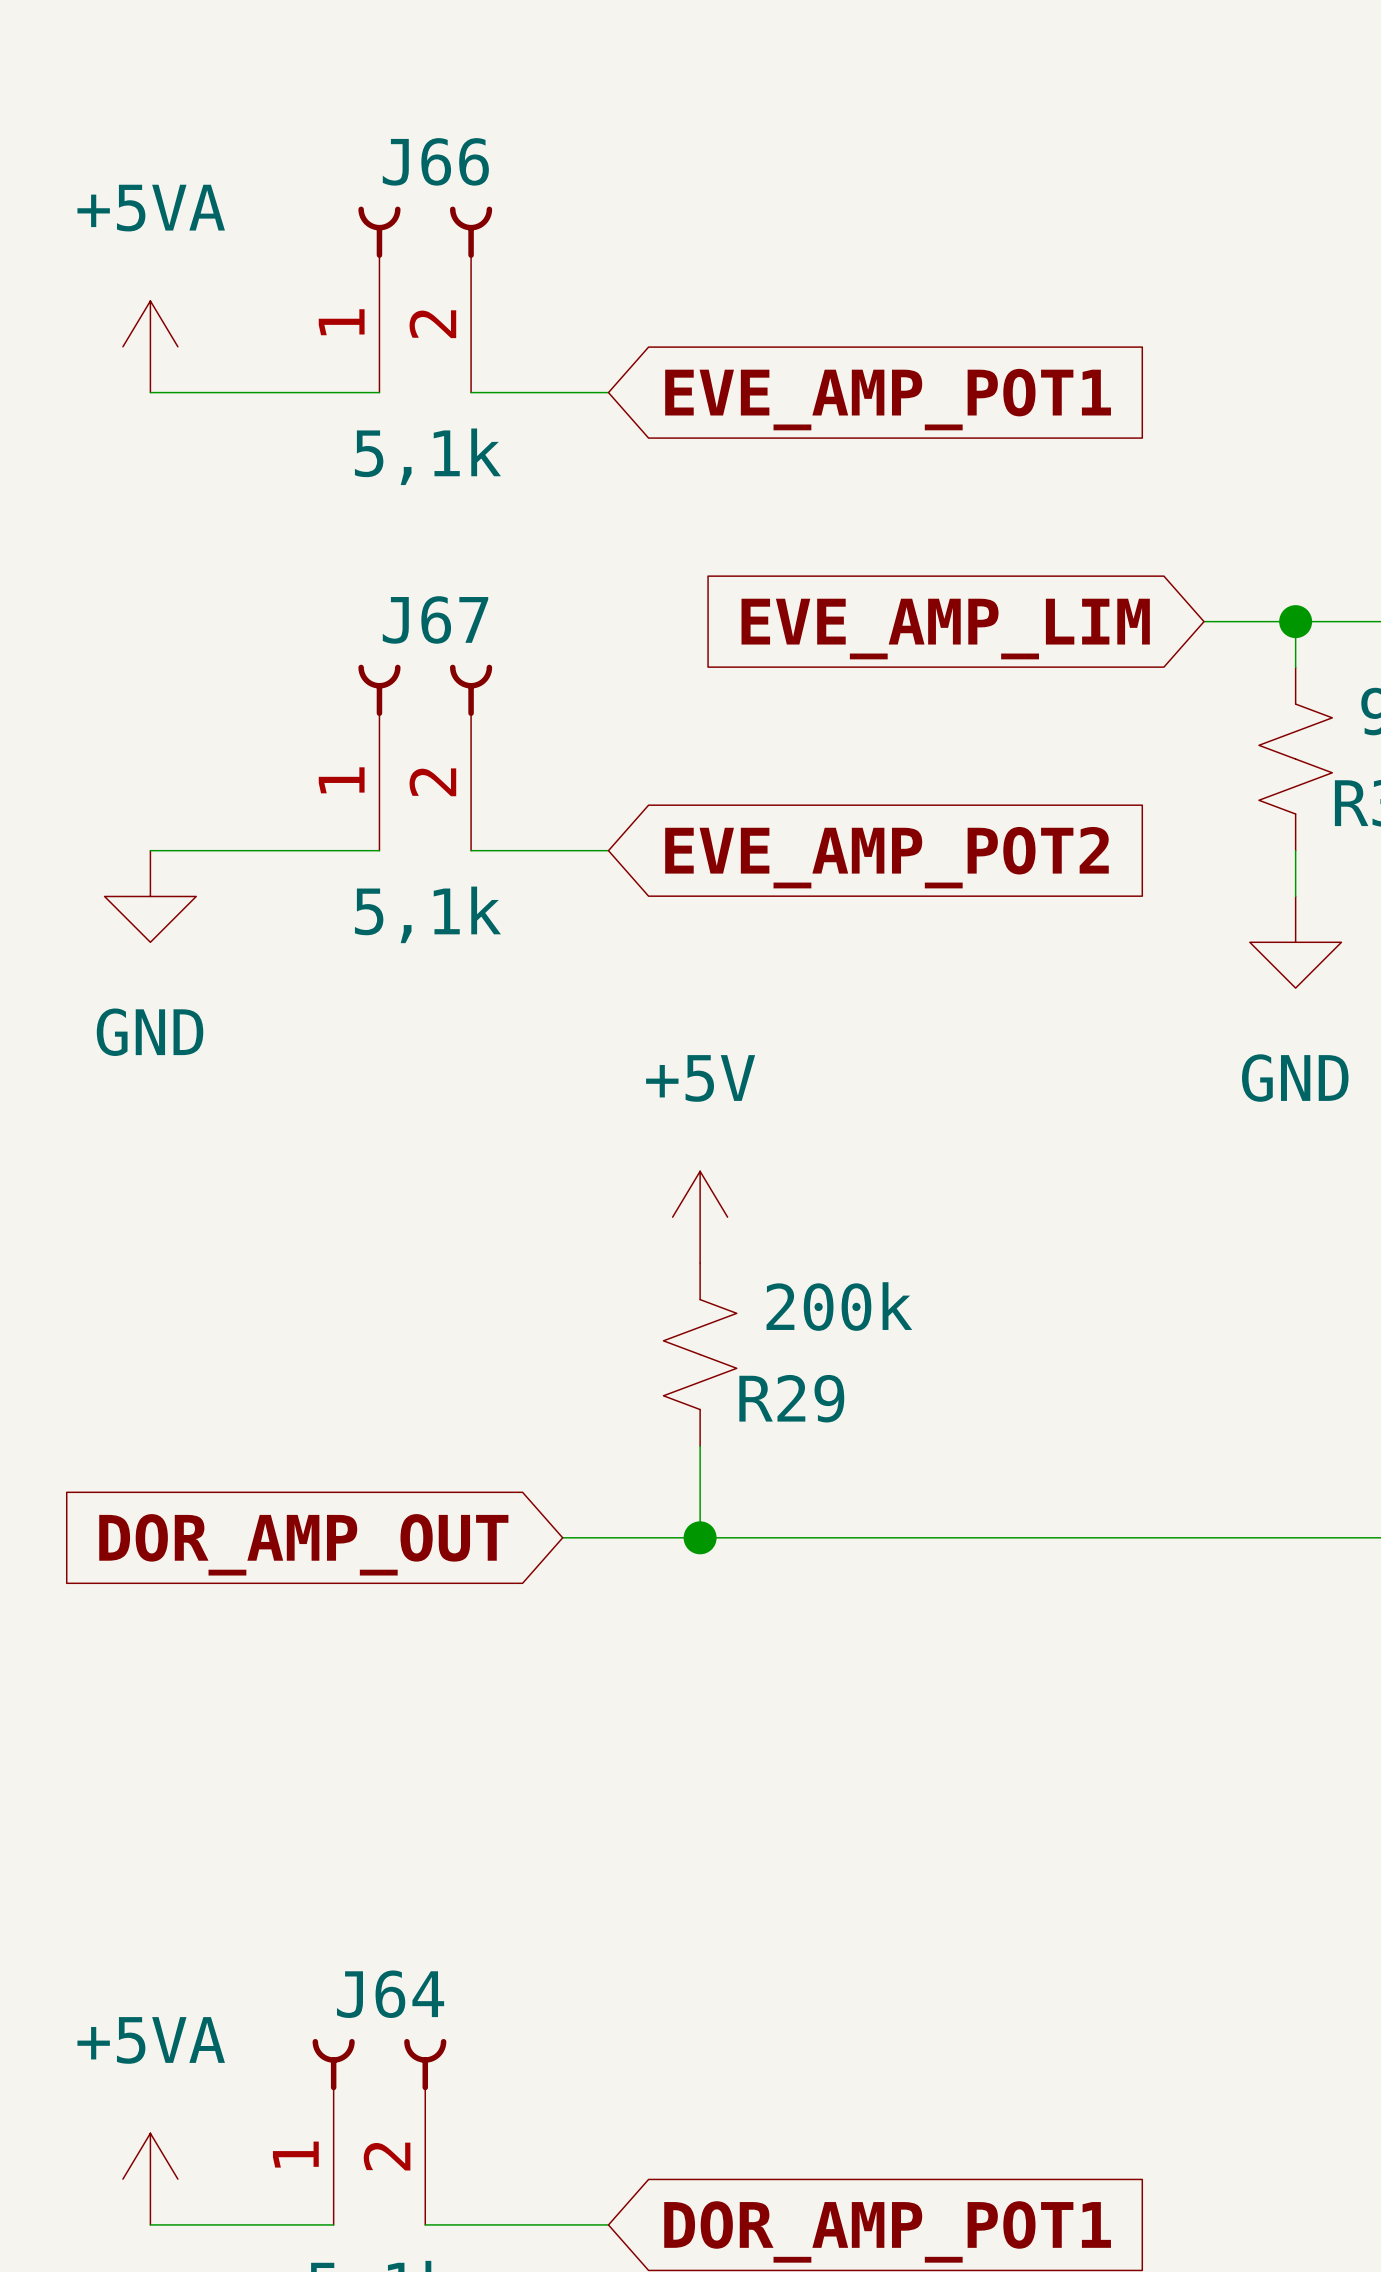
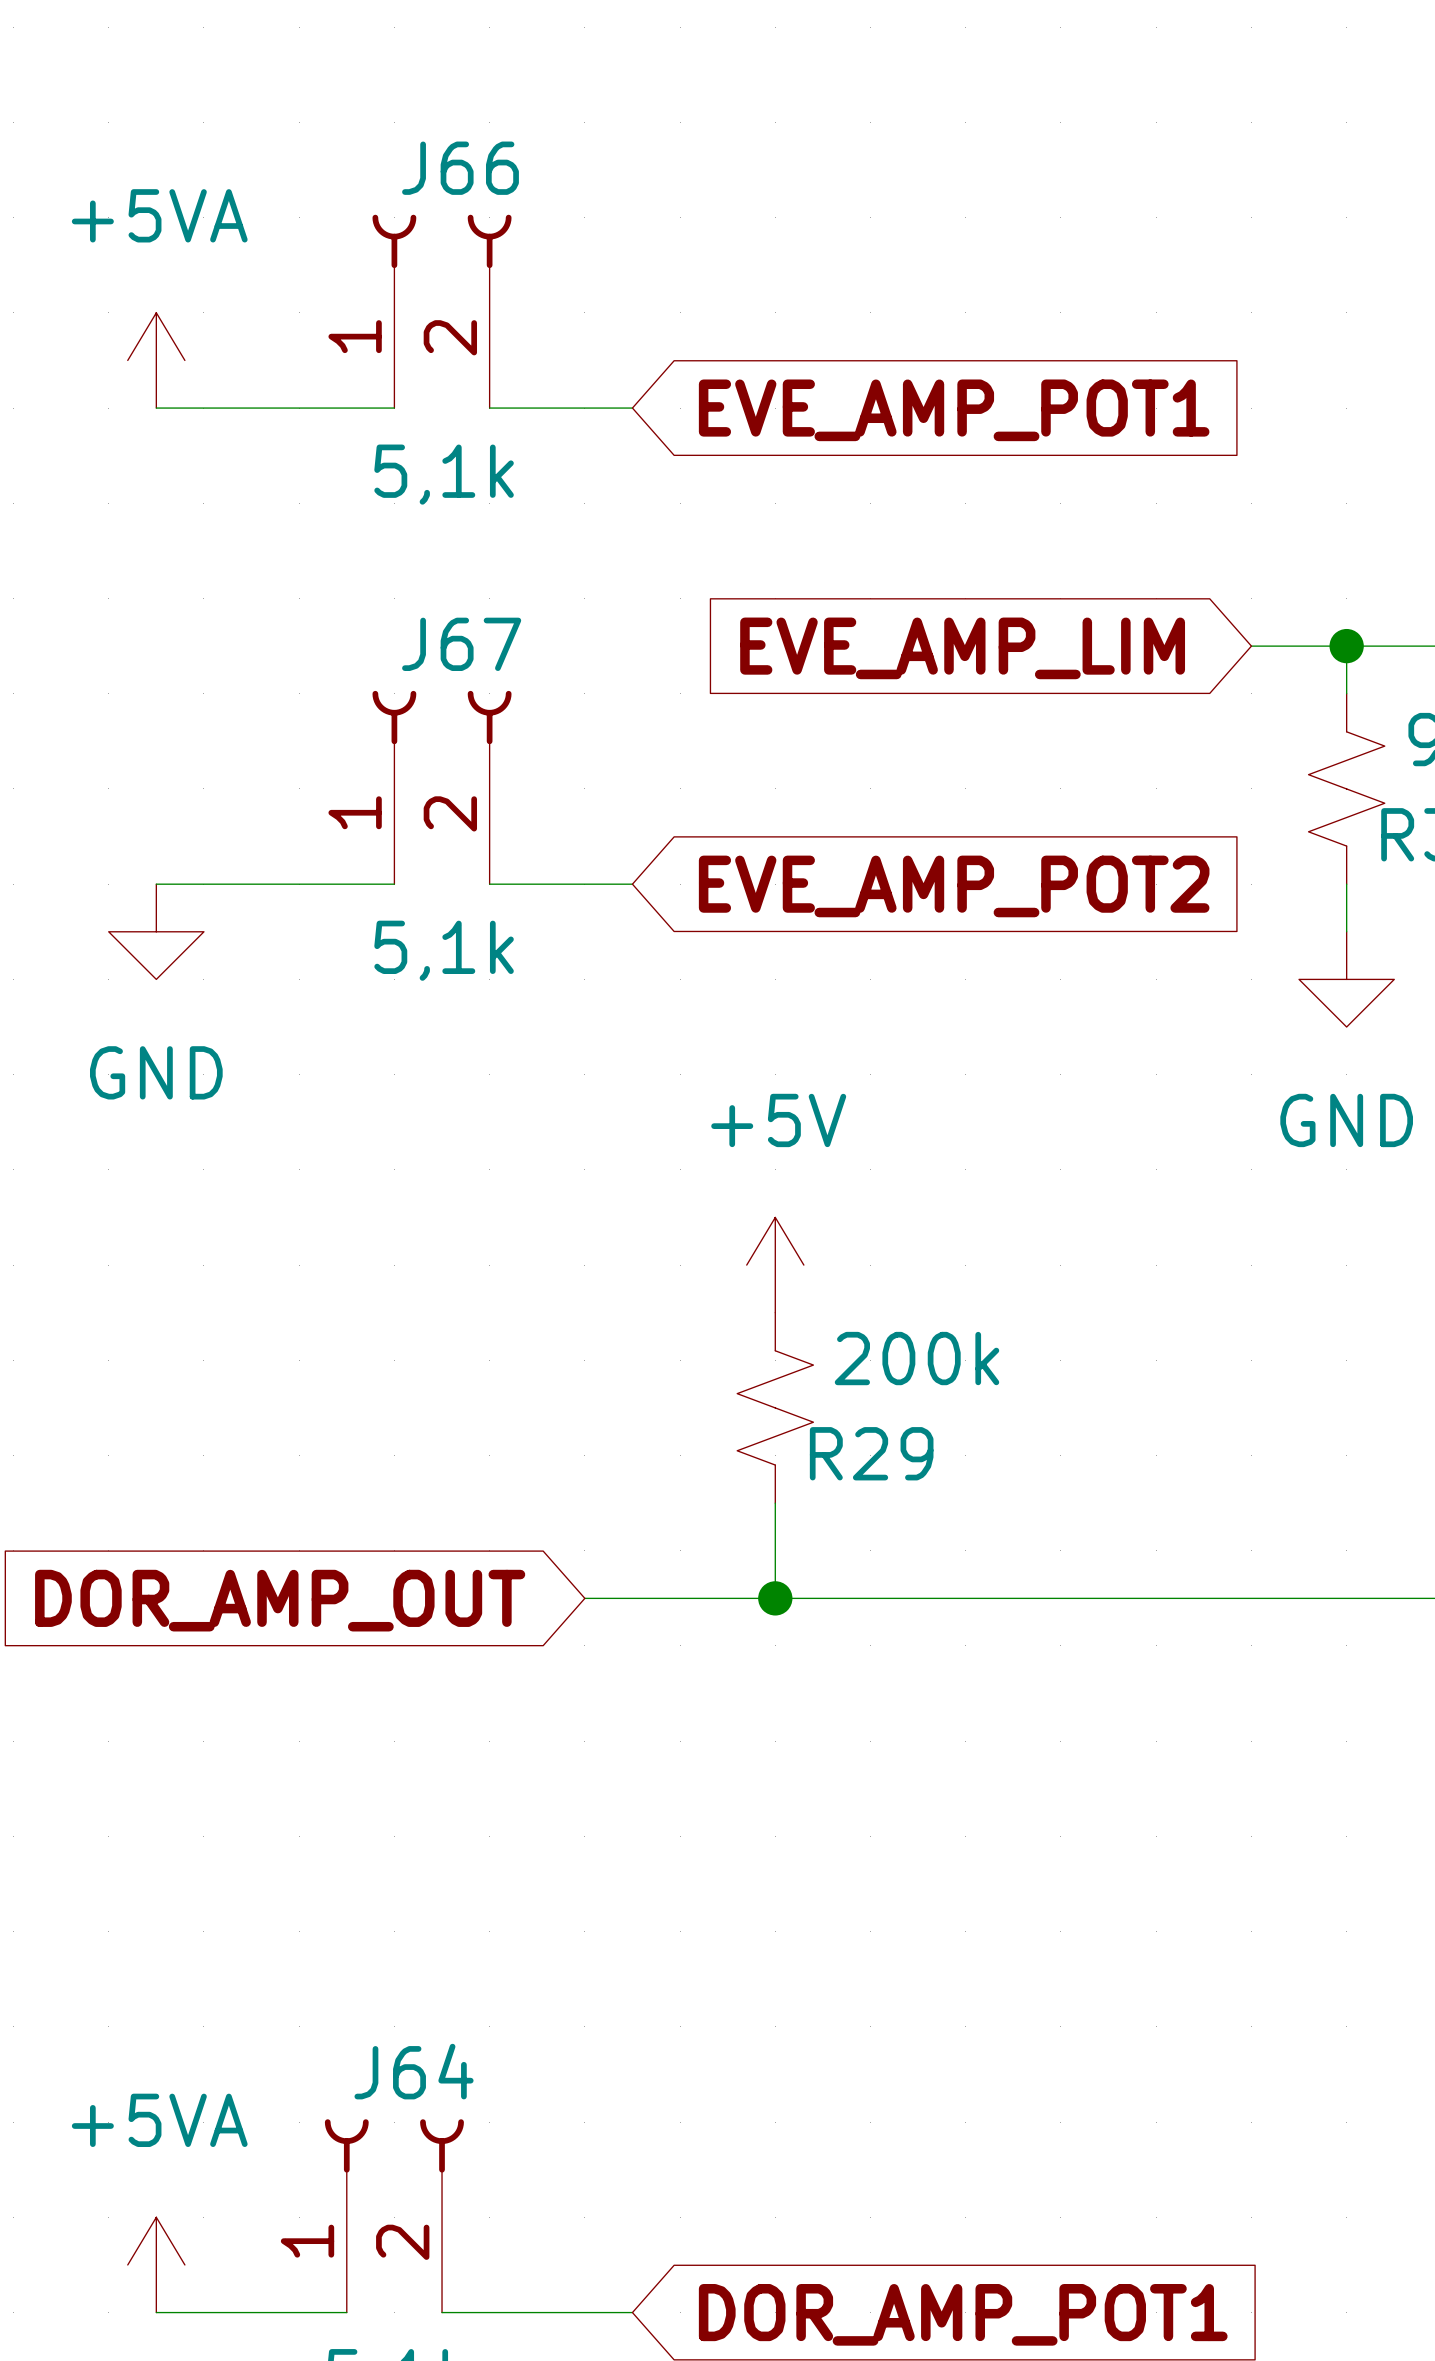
power symbol position: +5V (700, 1217) -> +5V (775, 1265)
R29 position: (700, 1354) -> (775, 1407)
wire: (700, 1446) (700, 1537) -> (775, 1503) (775, 1598)
junction position: (700, 1537) -> (775, 1598)

